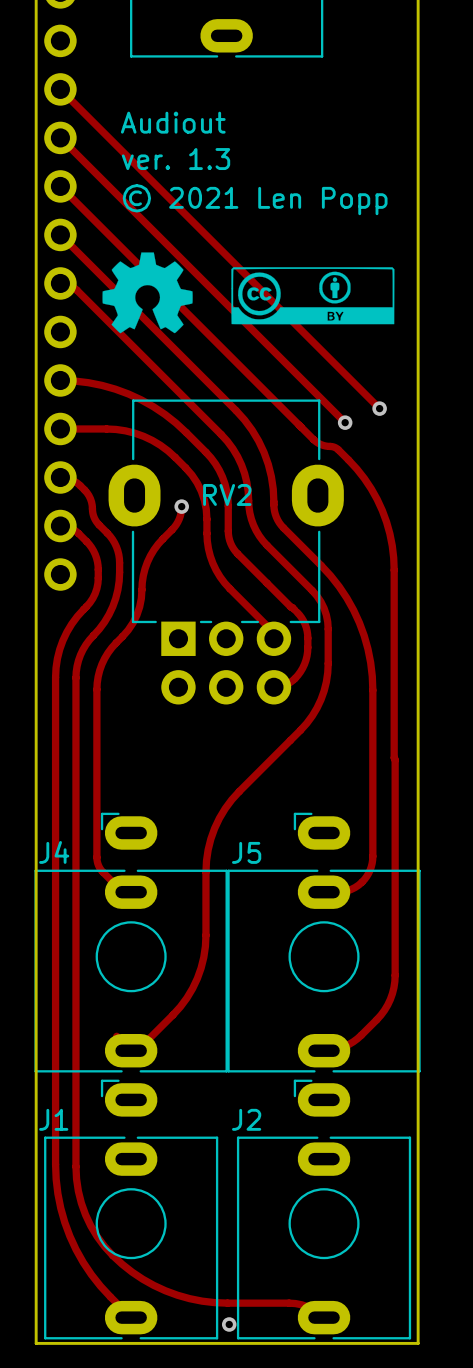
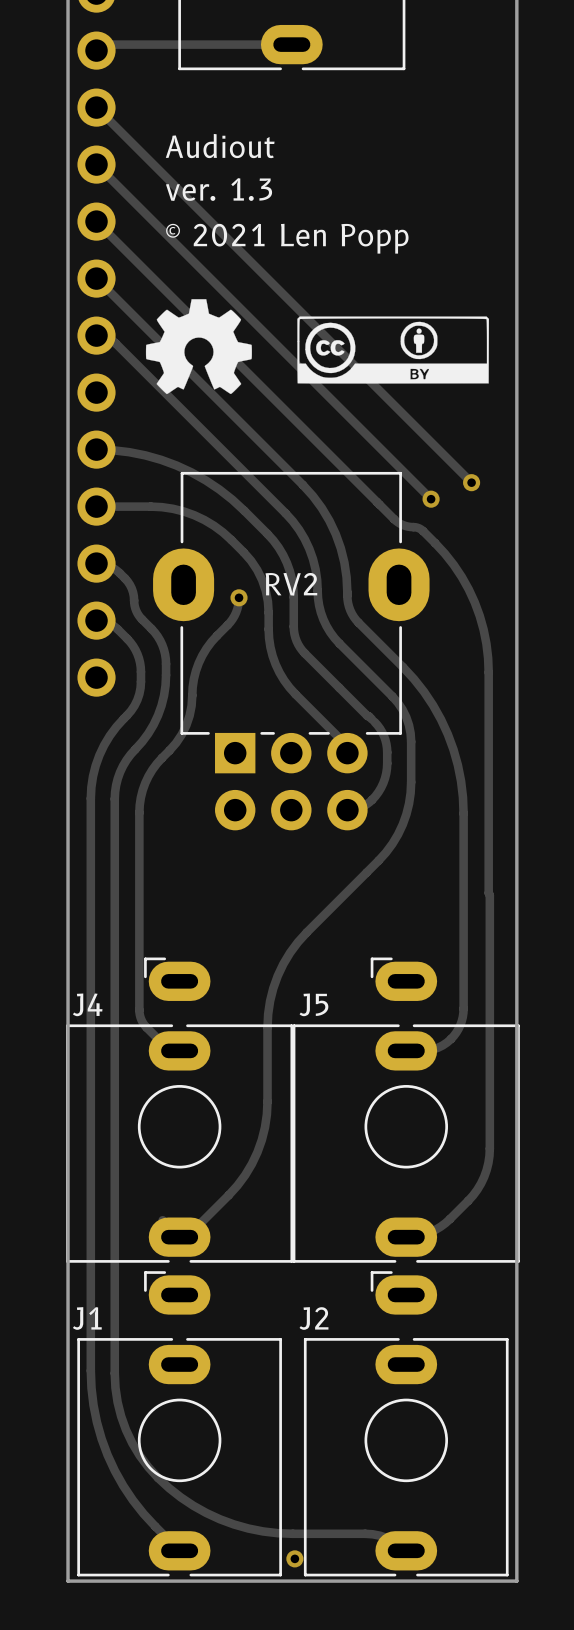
track: none -> (291, 44) (110, 44) (103, 46) (96, 50)

